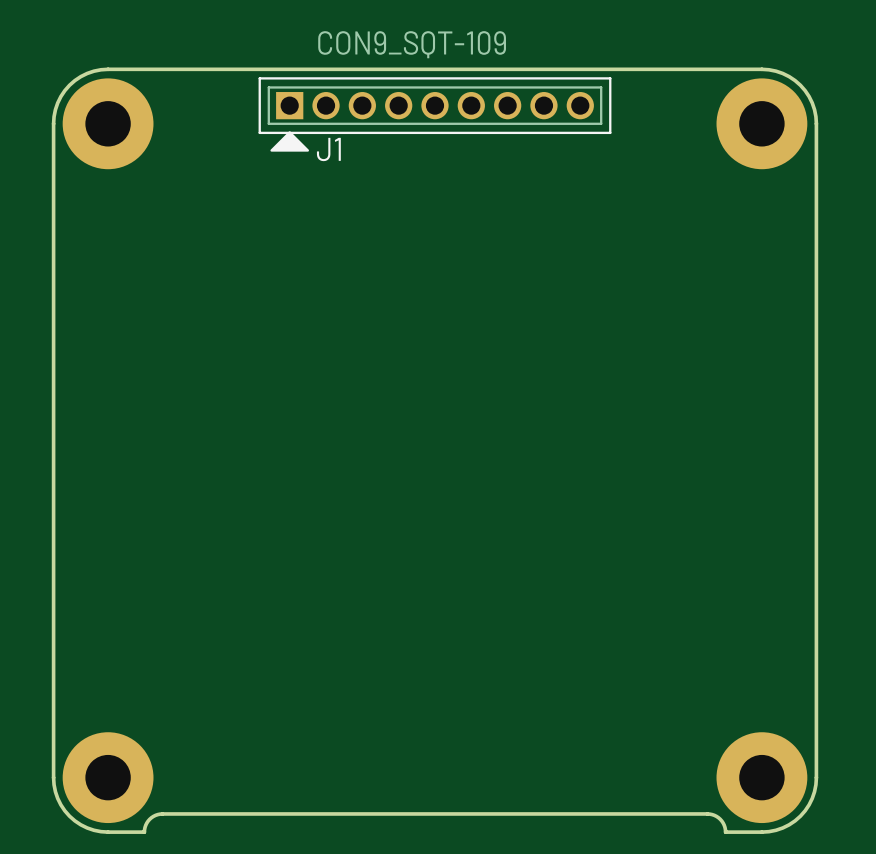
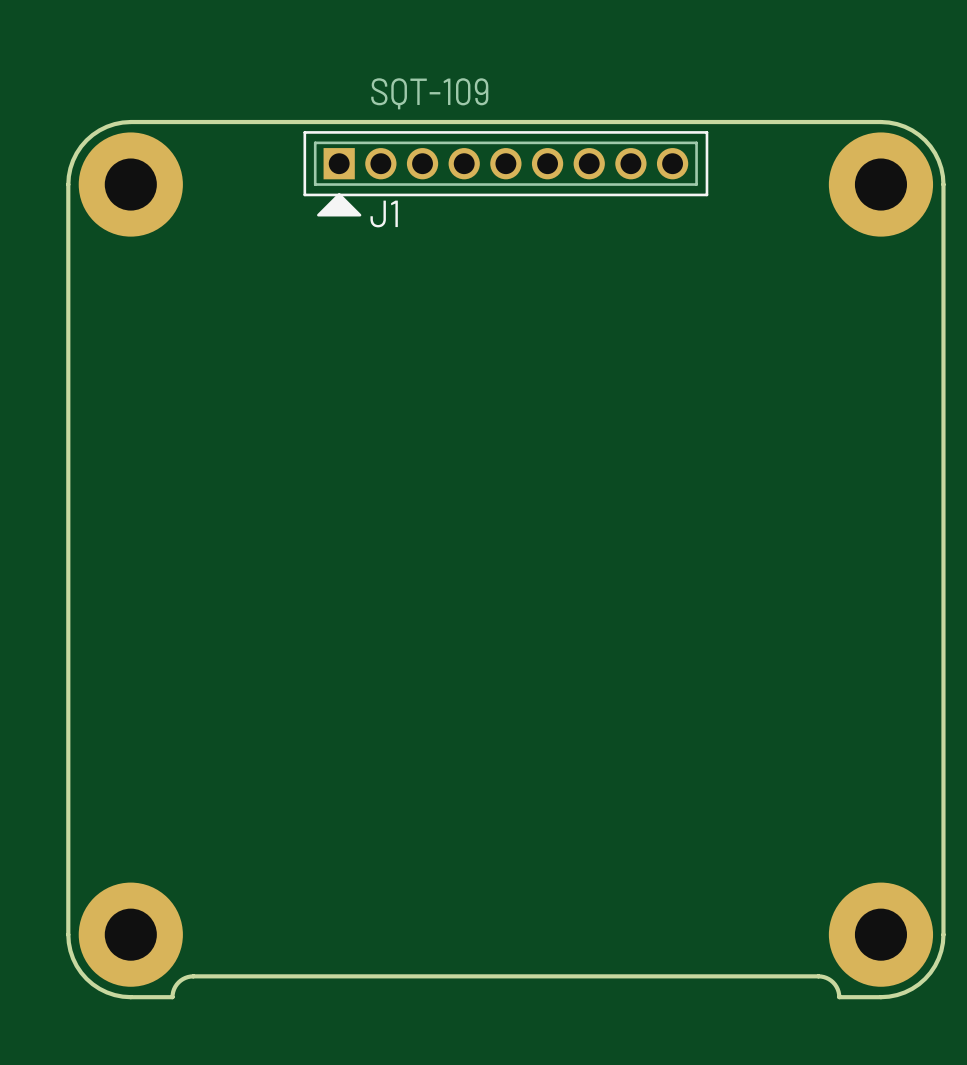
J1 value: CON9_SQT-109 (412, 44) -> SQT-109 (429, 93)

